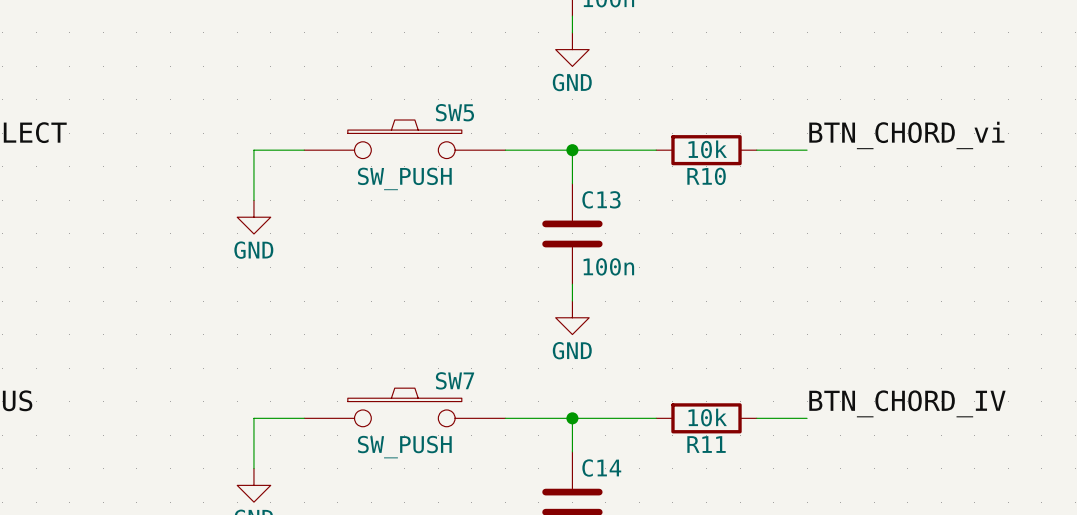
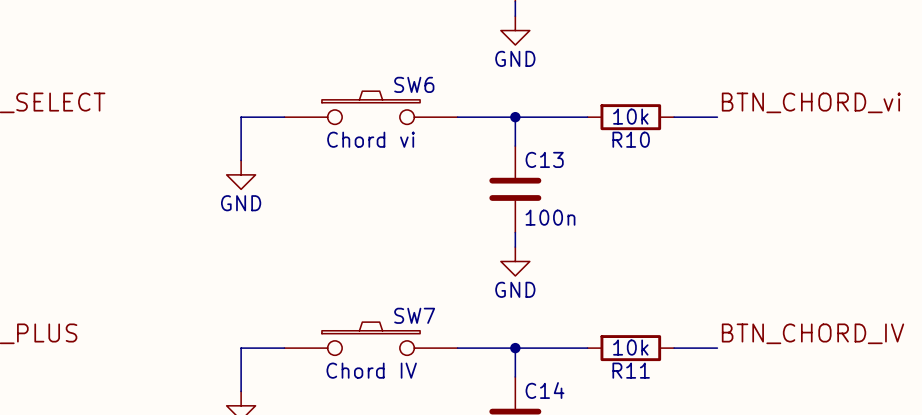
SW5 name: SW5 (454, 112) -> SW6 (414, 84)
SW5 value: SW_PUSH (404, 178) -> Chord vi (371, 139)
SW7 value: SW_PUSH (404, 447) -> Chord IV (371, 370)

